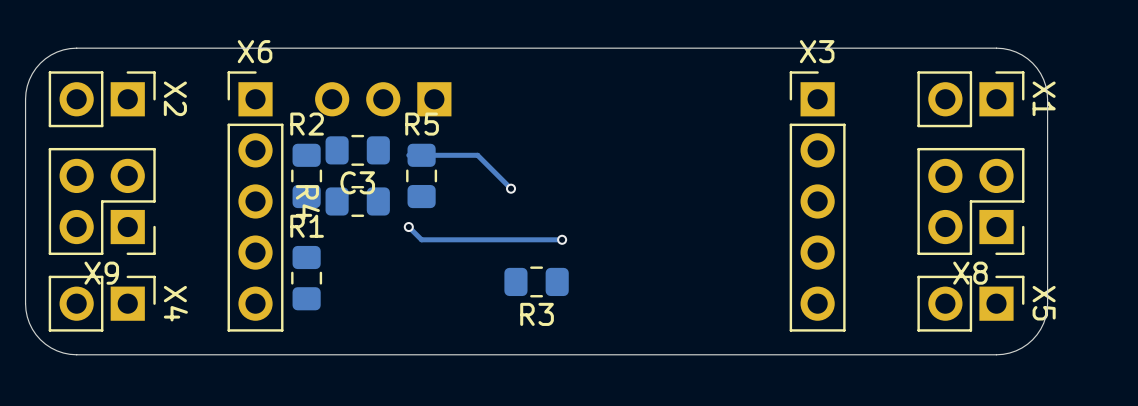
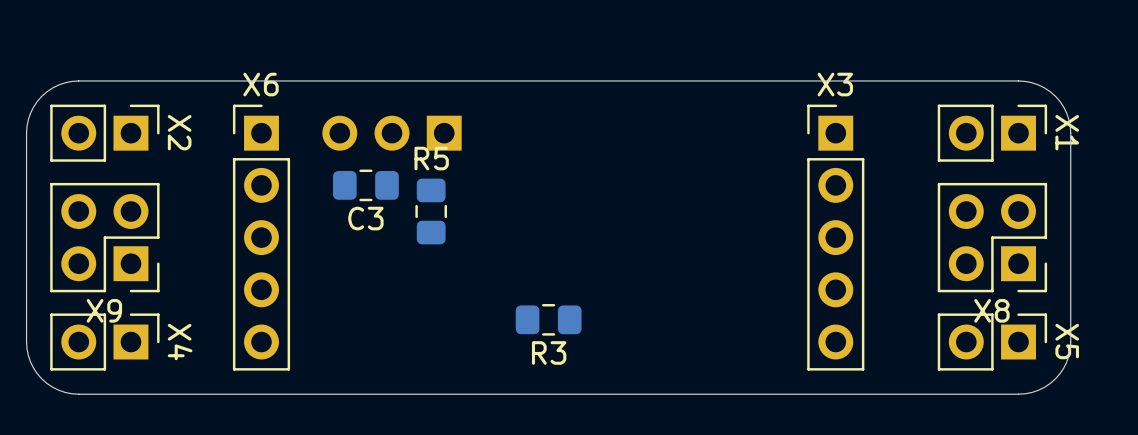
track: (408, 155) (477, 155) (511, 188) -> none
R2: (306, 175) -> none
via: (511, 188) -> none
R4: (357, 201) -> none
track: (408, 227) (421, 239) (562, 239) -> none
via: (408, 227) -> none
via: (562, 239) -> none
R1: (306, 278) -> none

